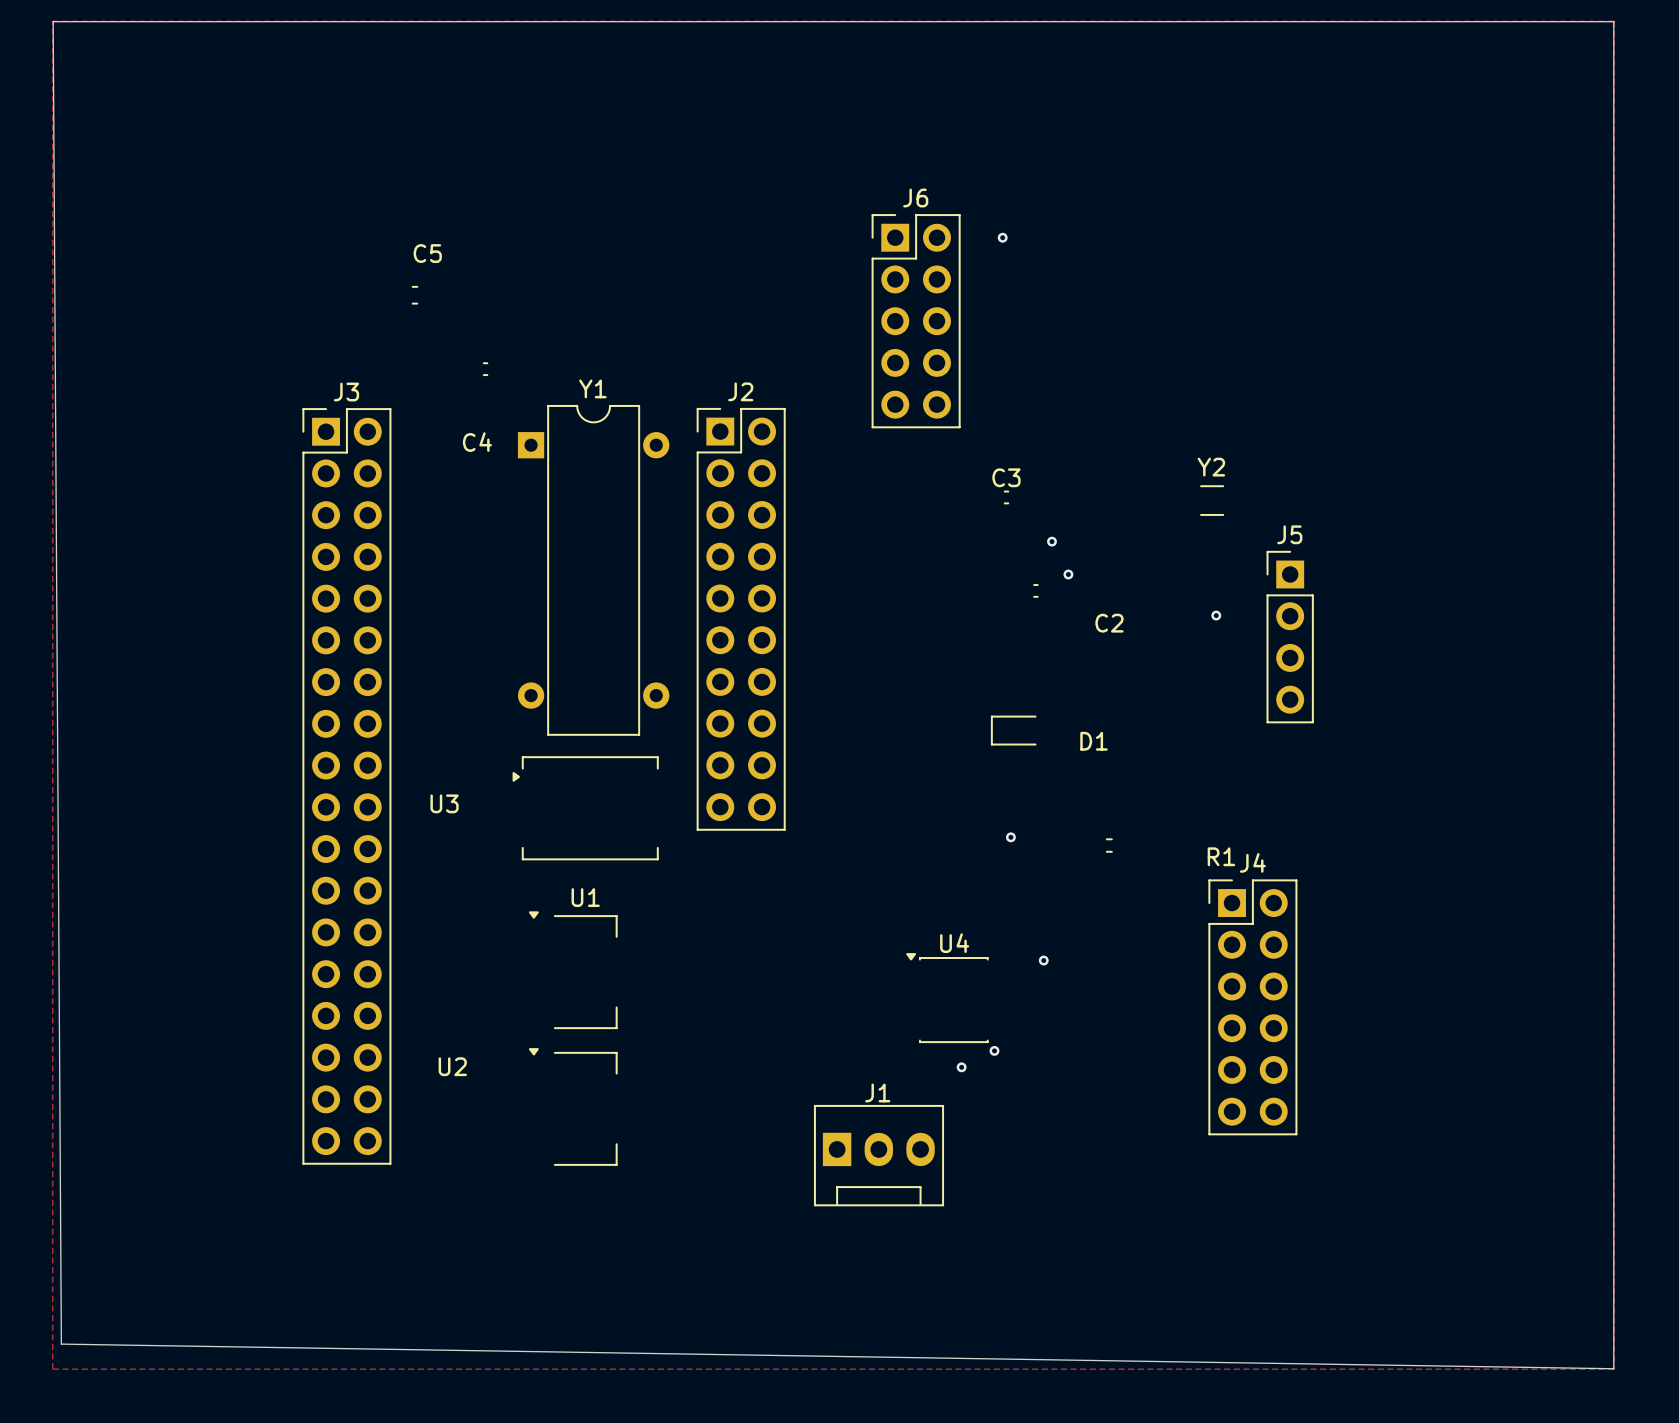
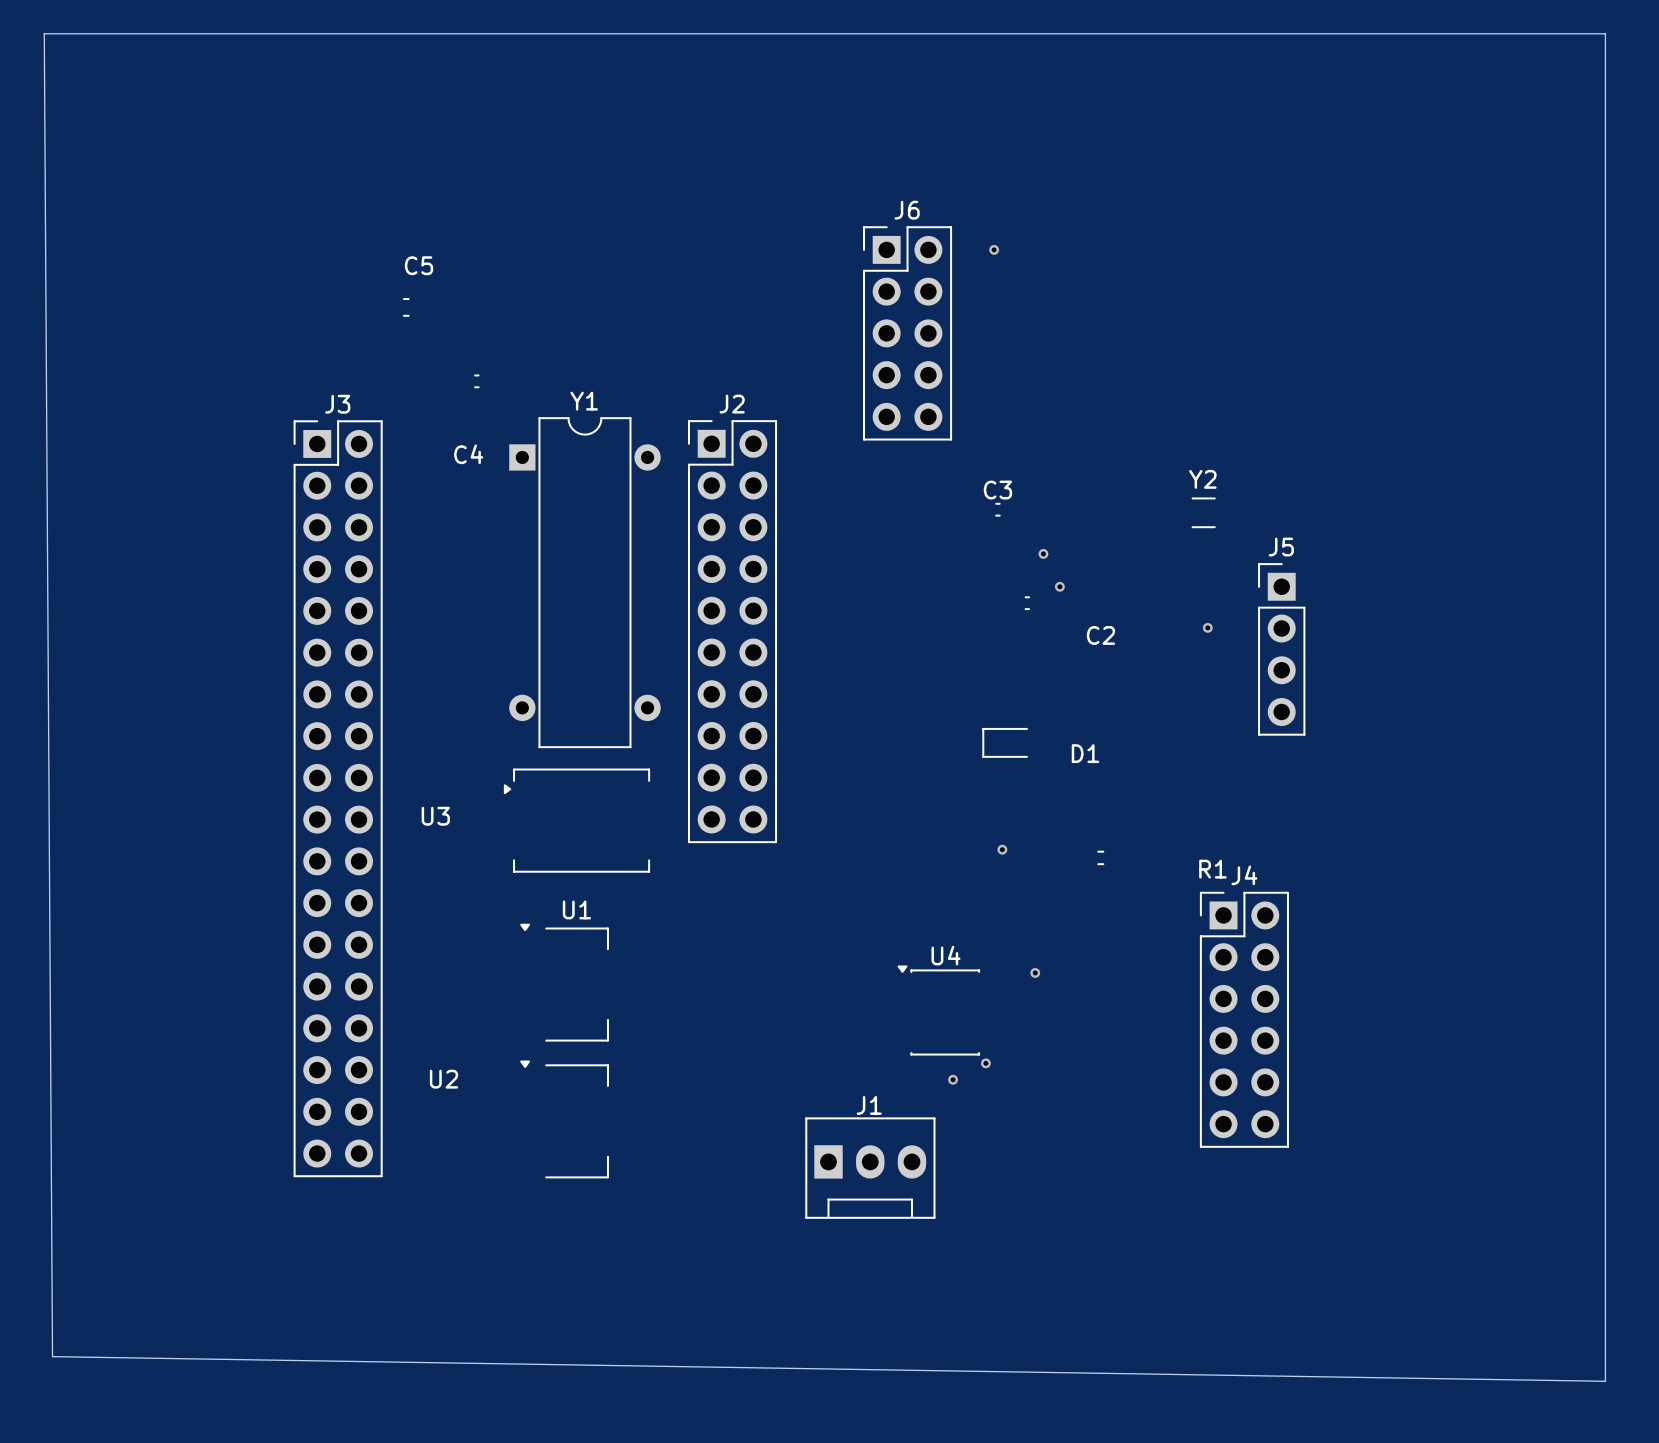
zone outline: (52, 21) (1614, 21) (1614, 1369) (52, 1369) (52, 21) -> none

